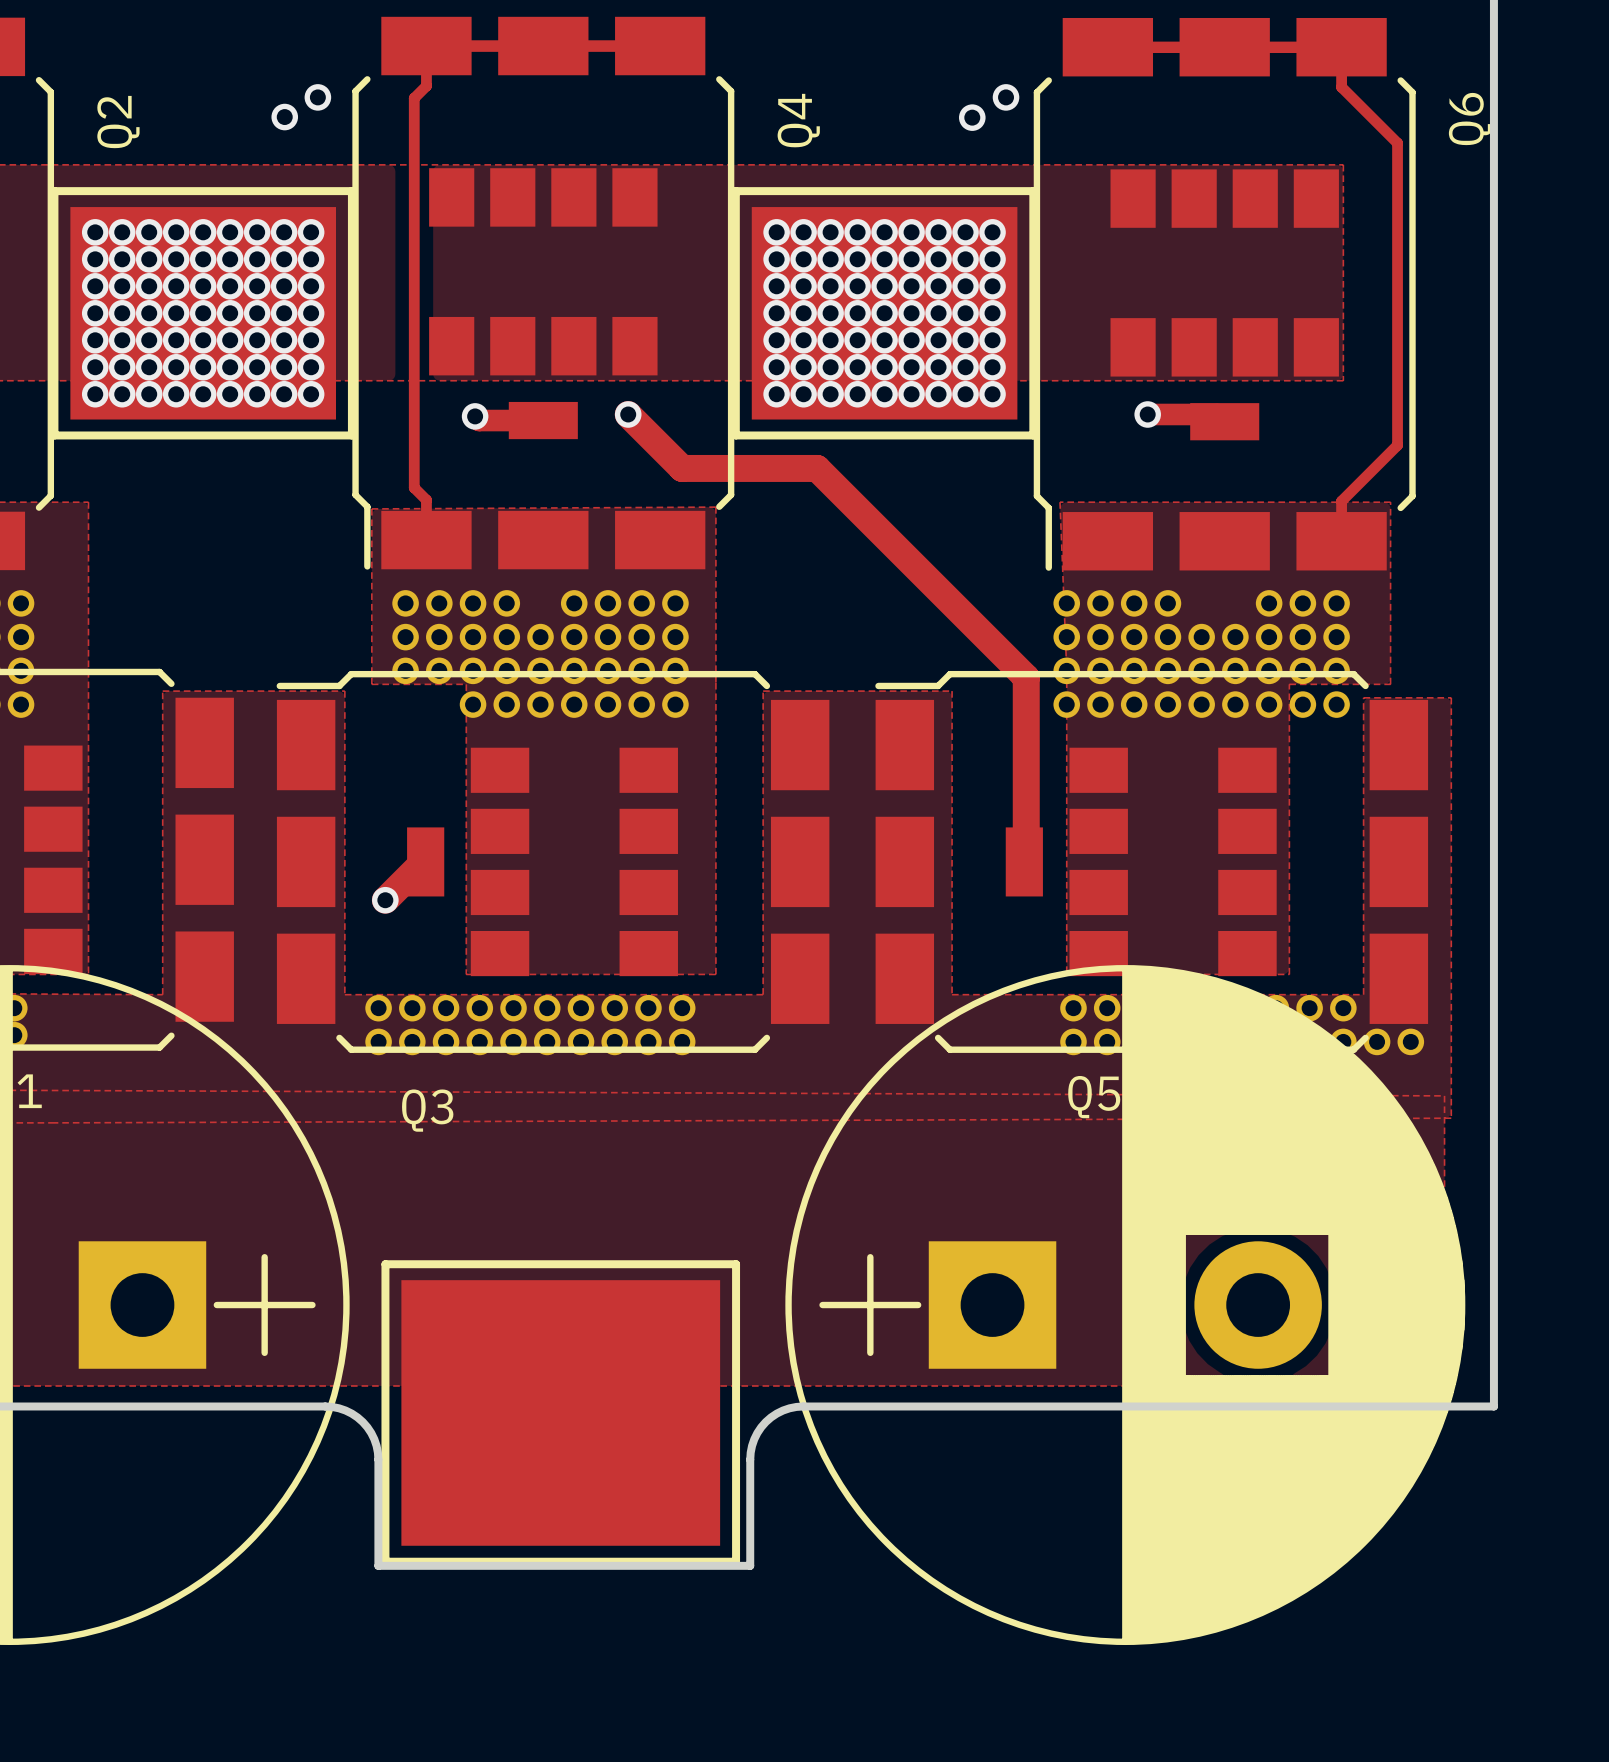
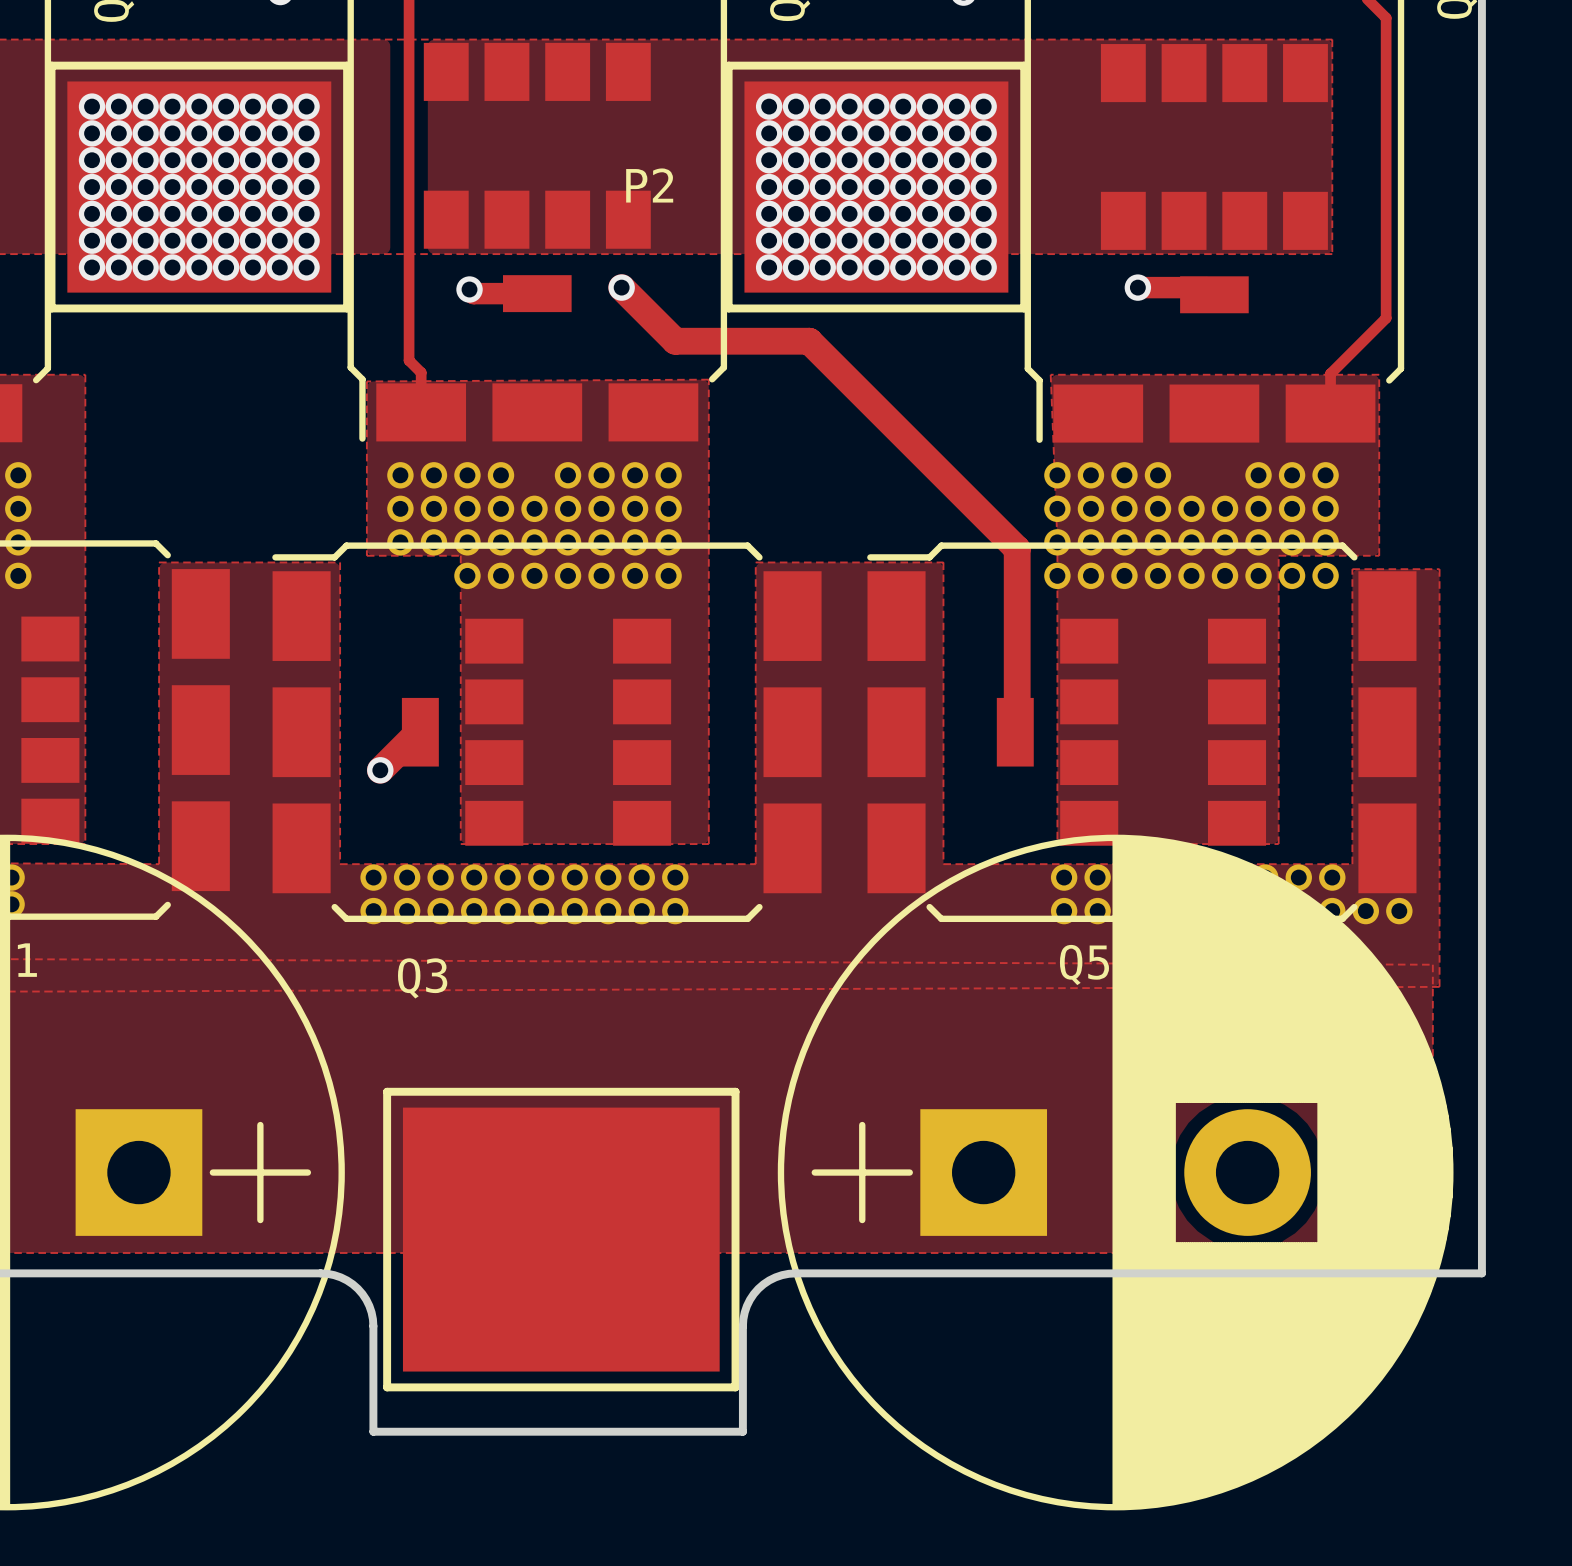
P2 name: none -> P2 (649, 185)
part position: (560, 1412) -> (561, 1239)

